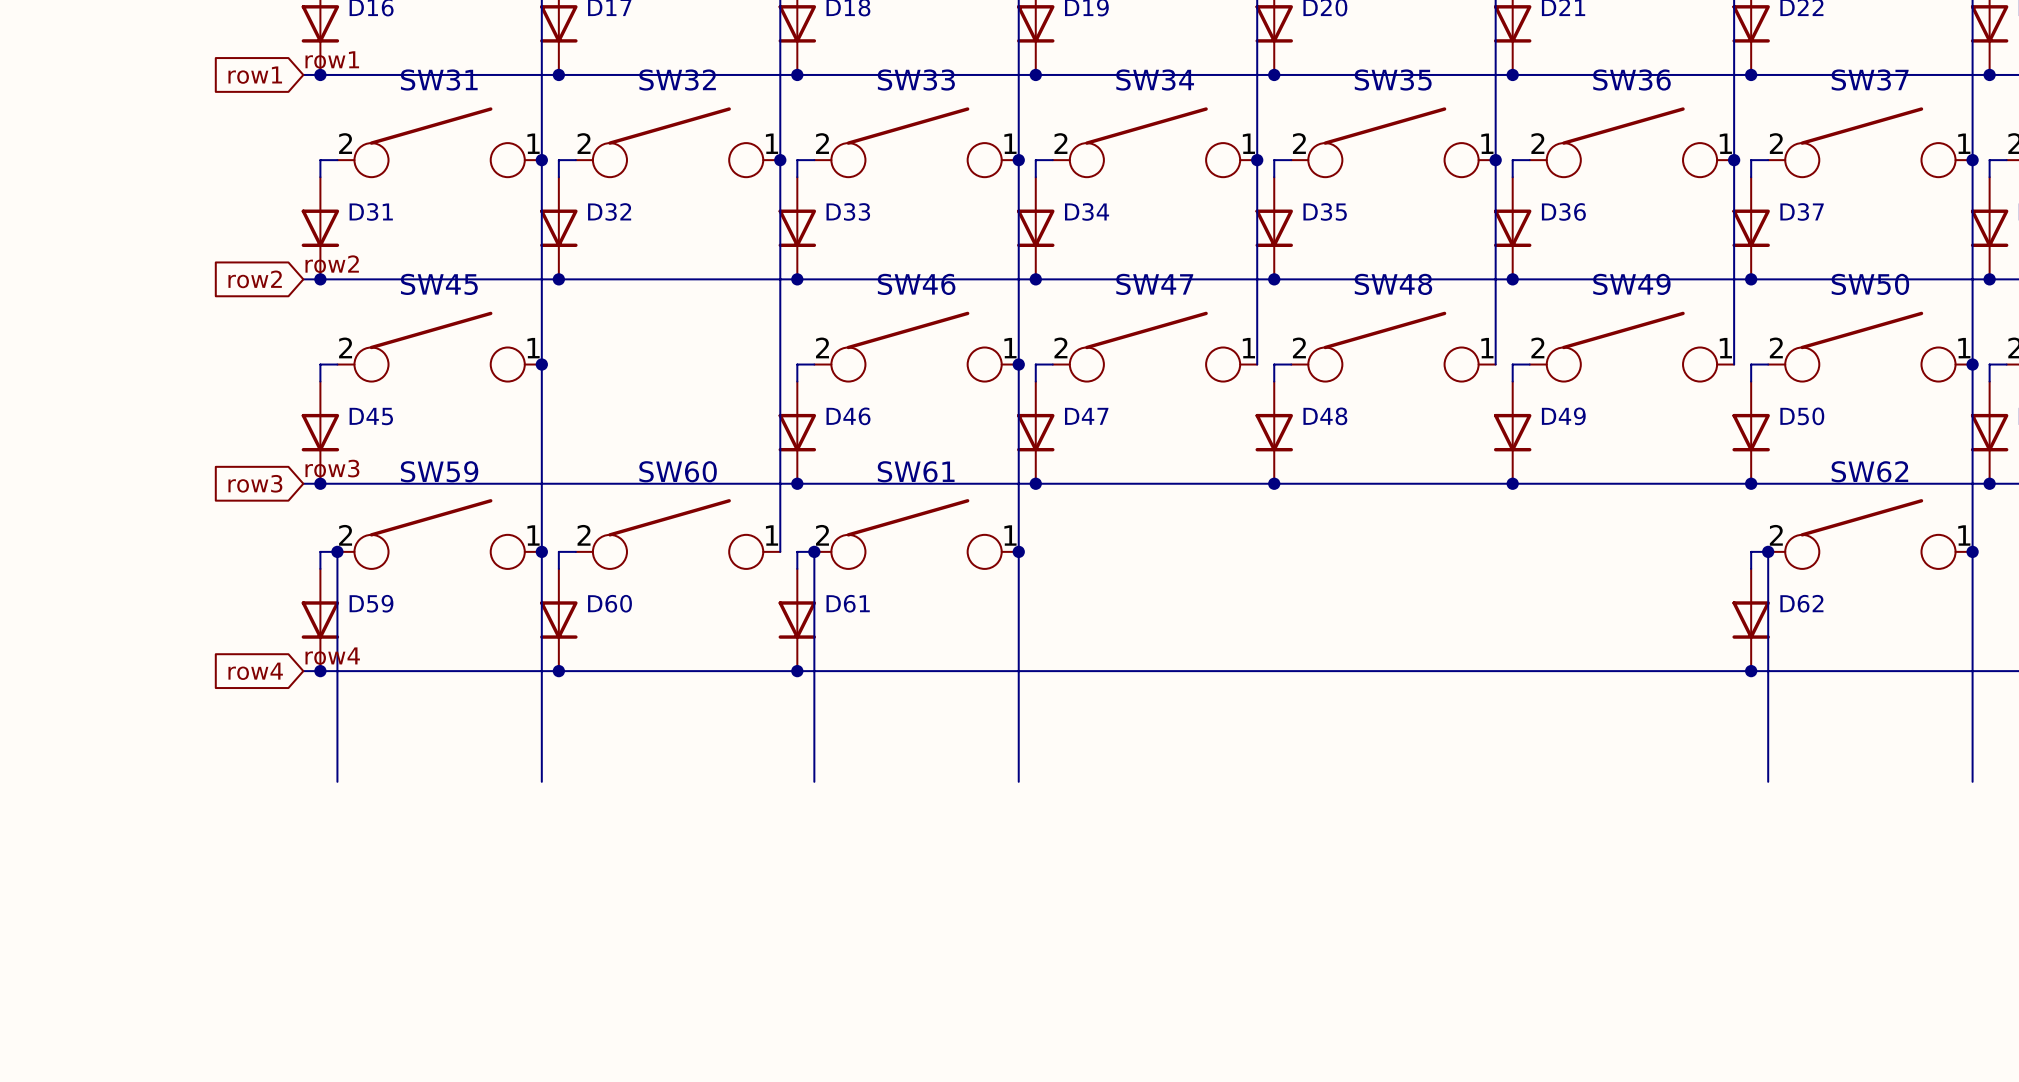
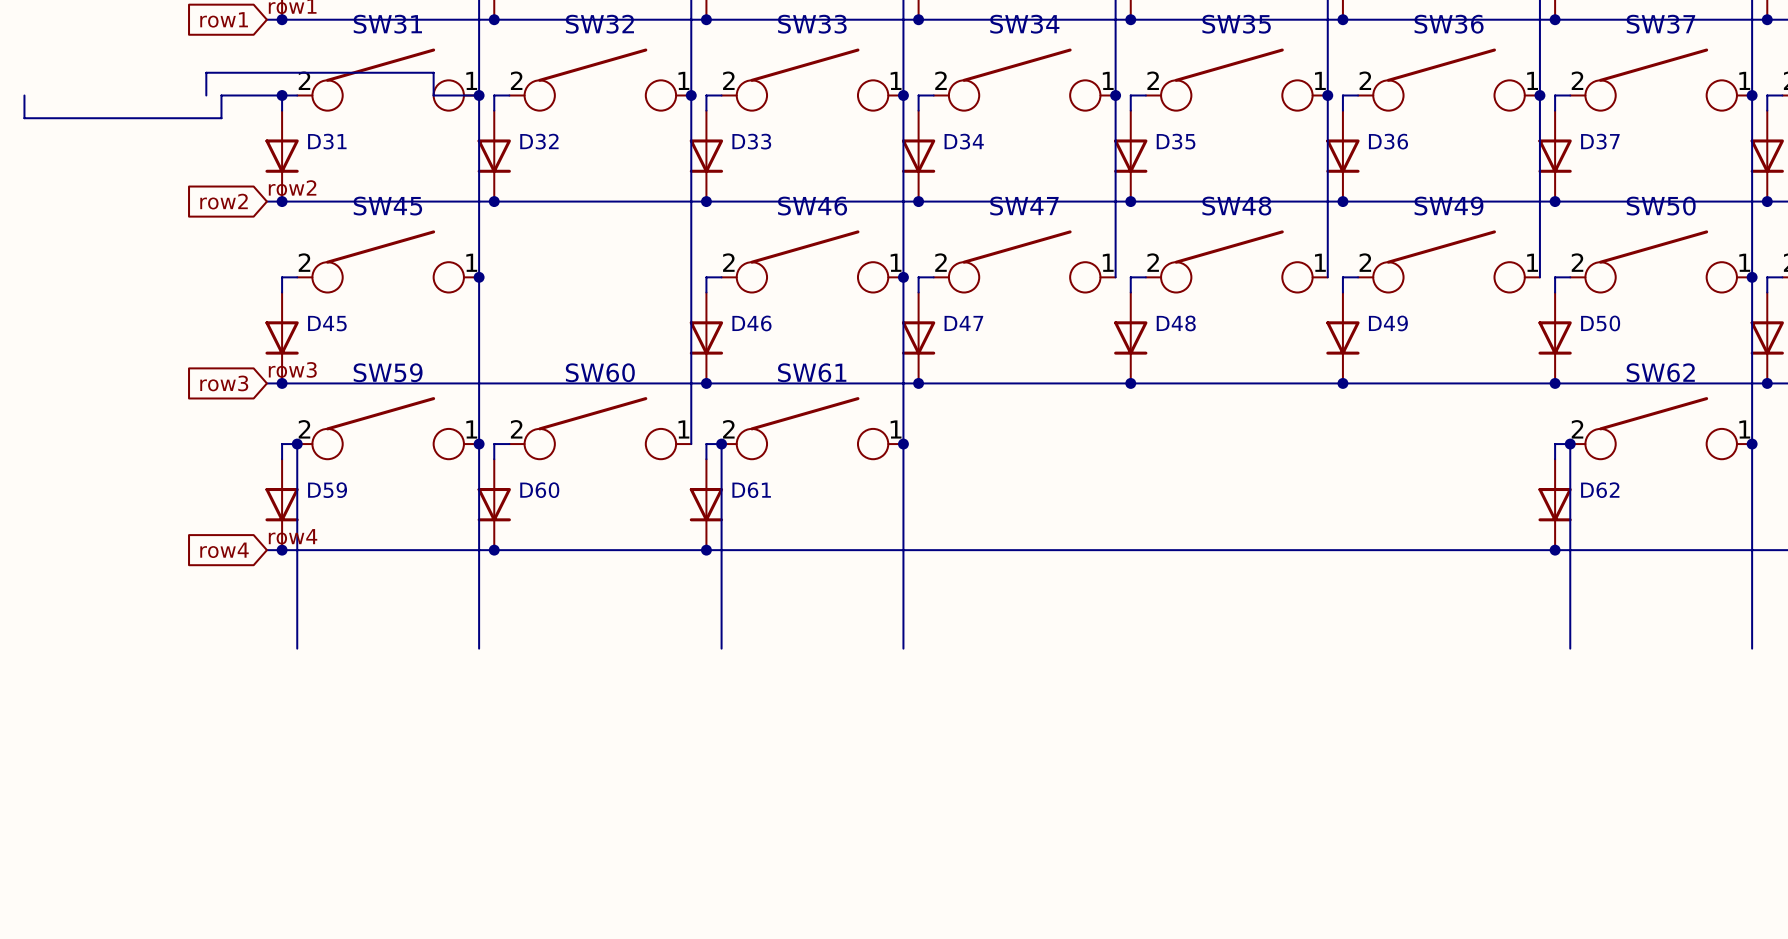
wire: none -> (24, 95) (24, 118) (221, 118) (221, 95) (282, 95)
wire: none -> (206, 95) (206, 72) (433, 72) (433, 95) (479, 95)
junction: none -> (282, 95)

